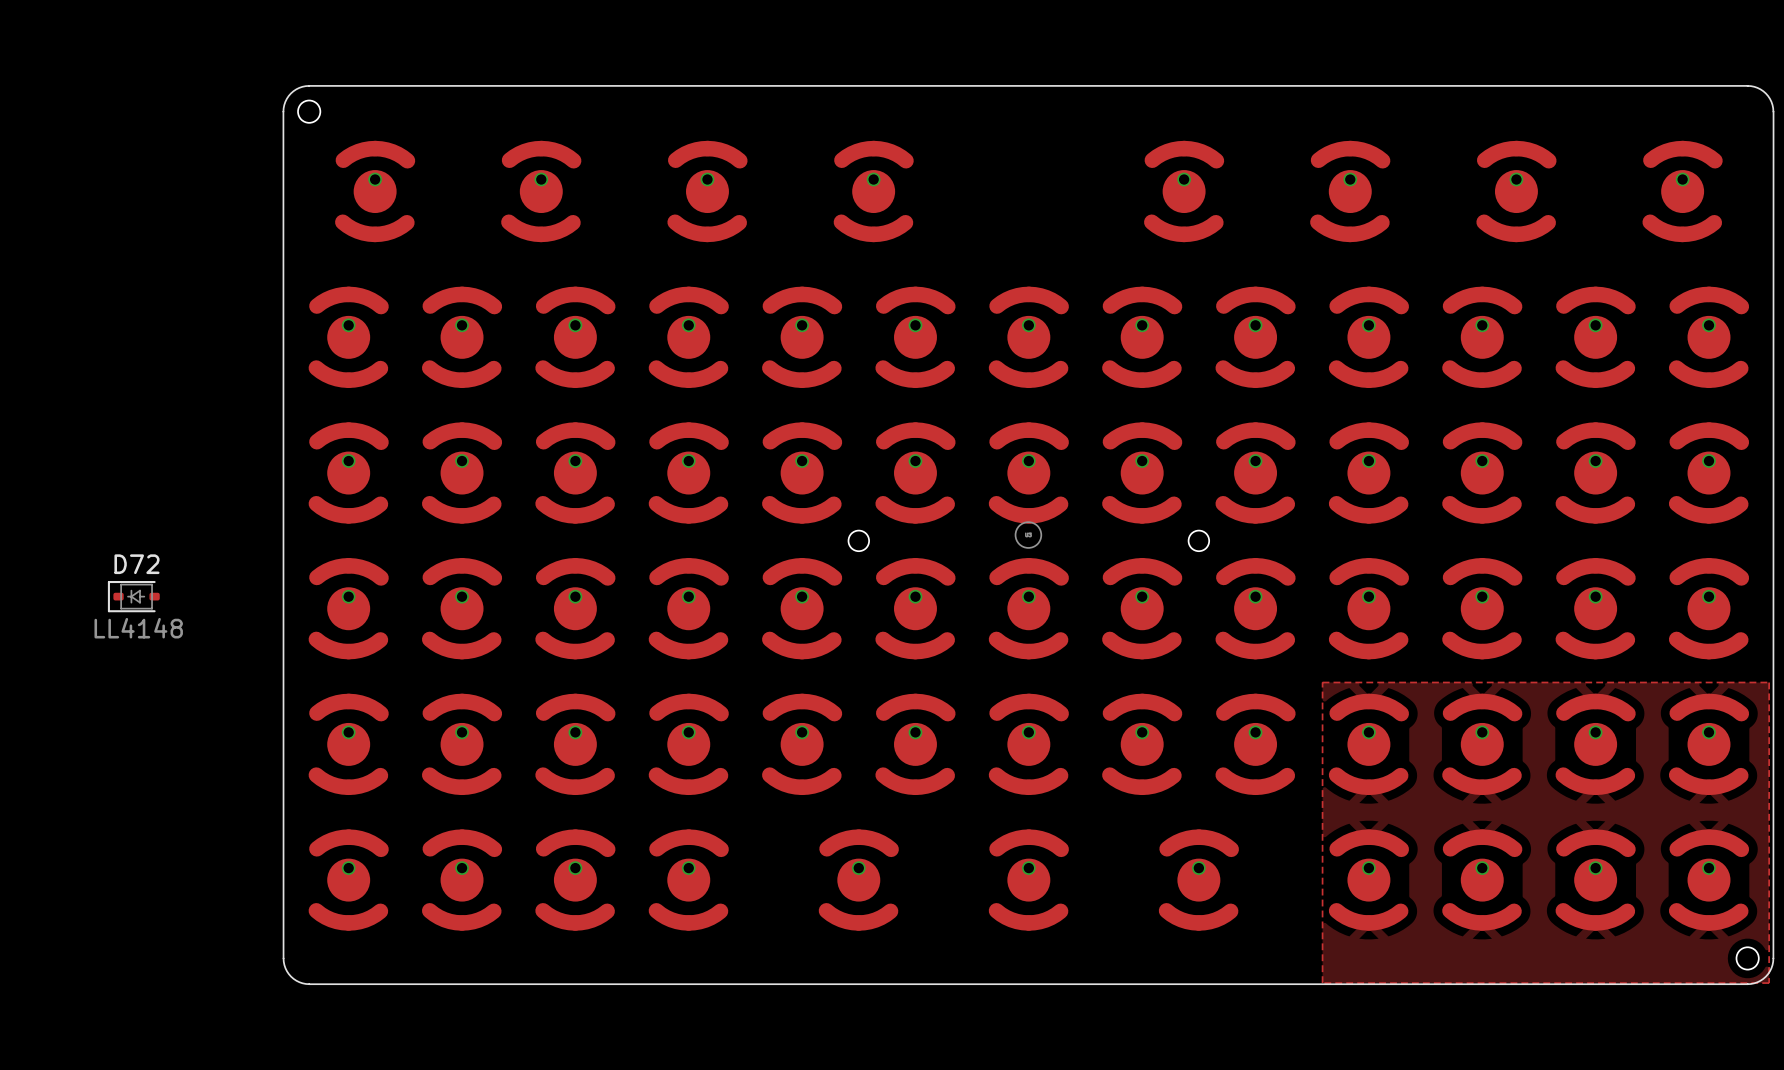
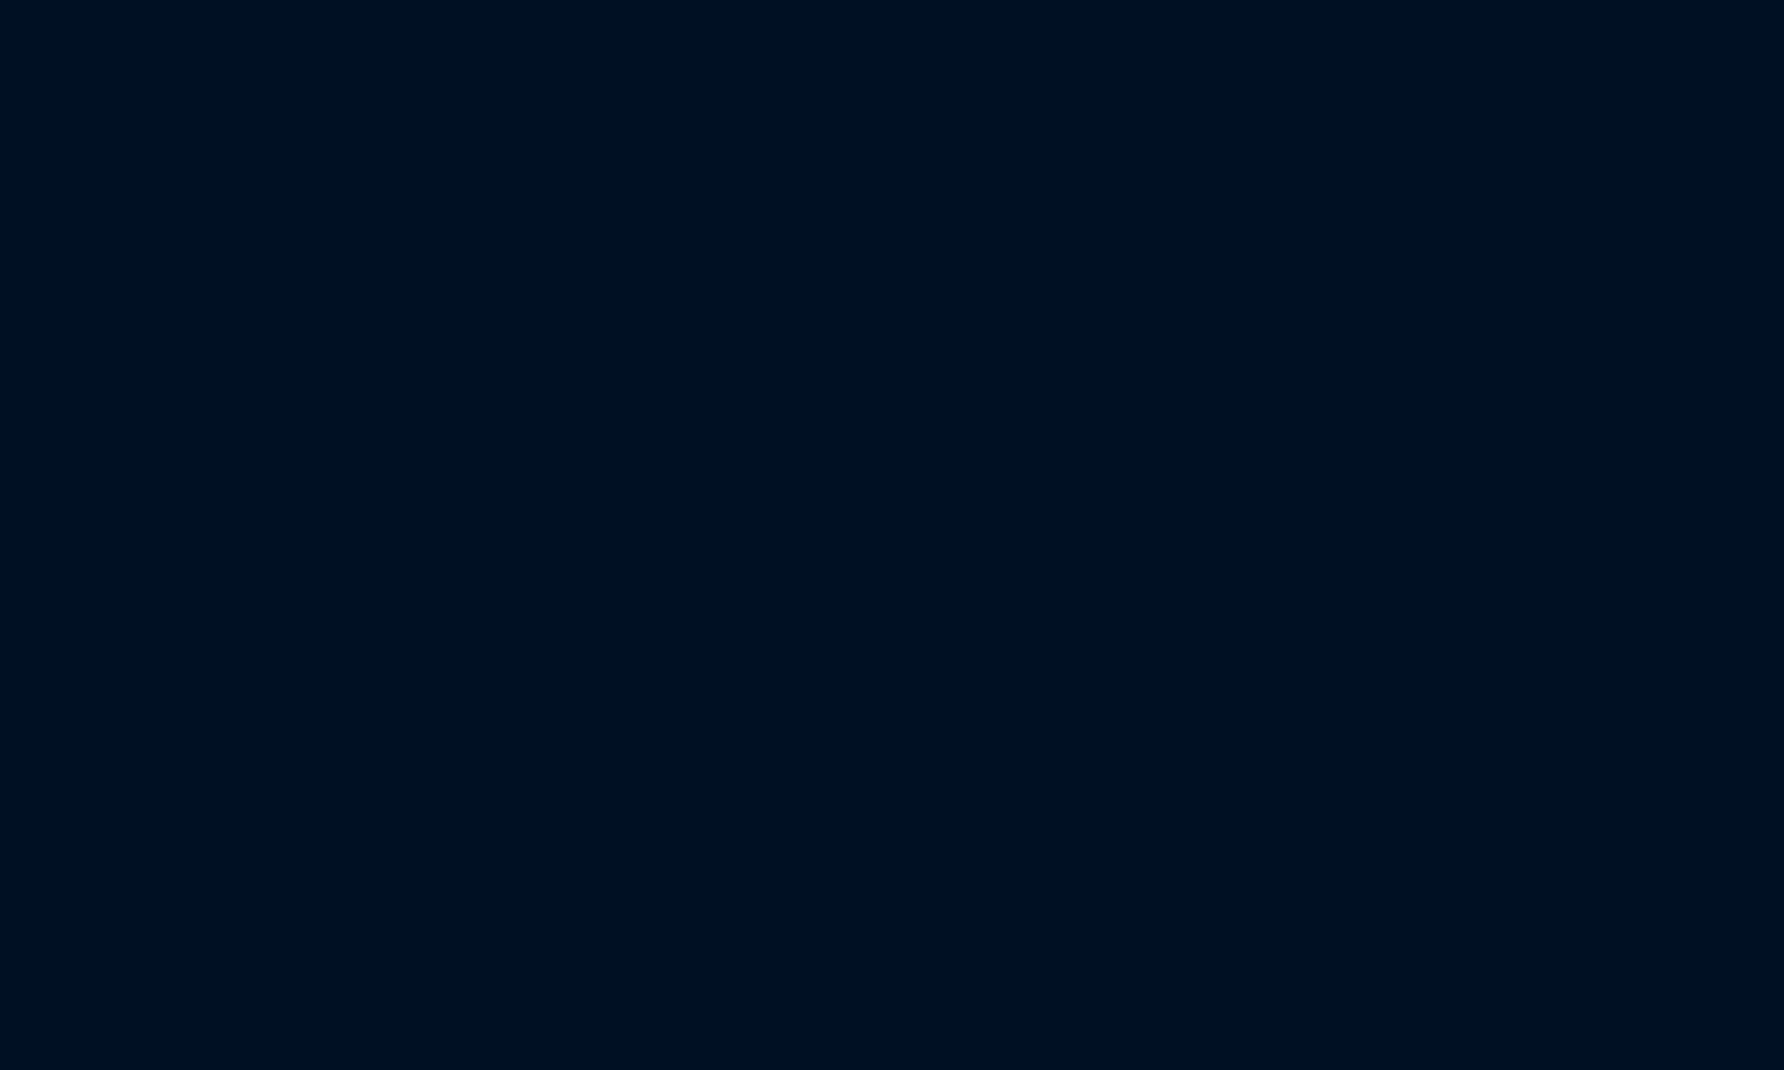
part: (1028, 535) -> none
D72: LL4148 (133, 596) -> none
zone outline: (1322, 682) (1769, 682) (1769, 983) (1322, 983) (1322, 682) -> none

